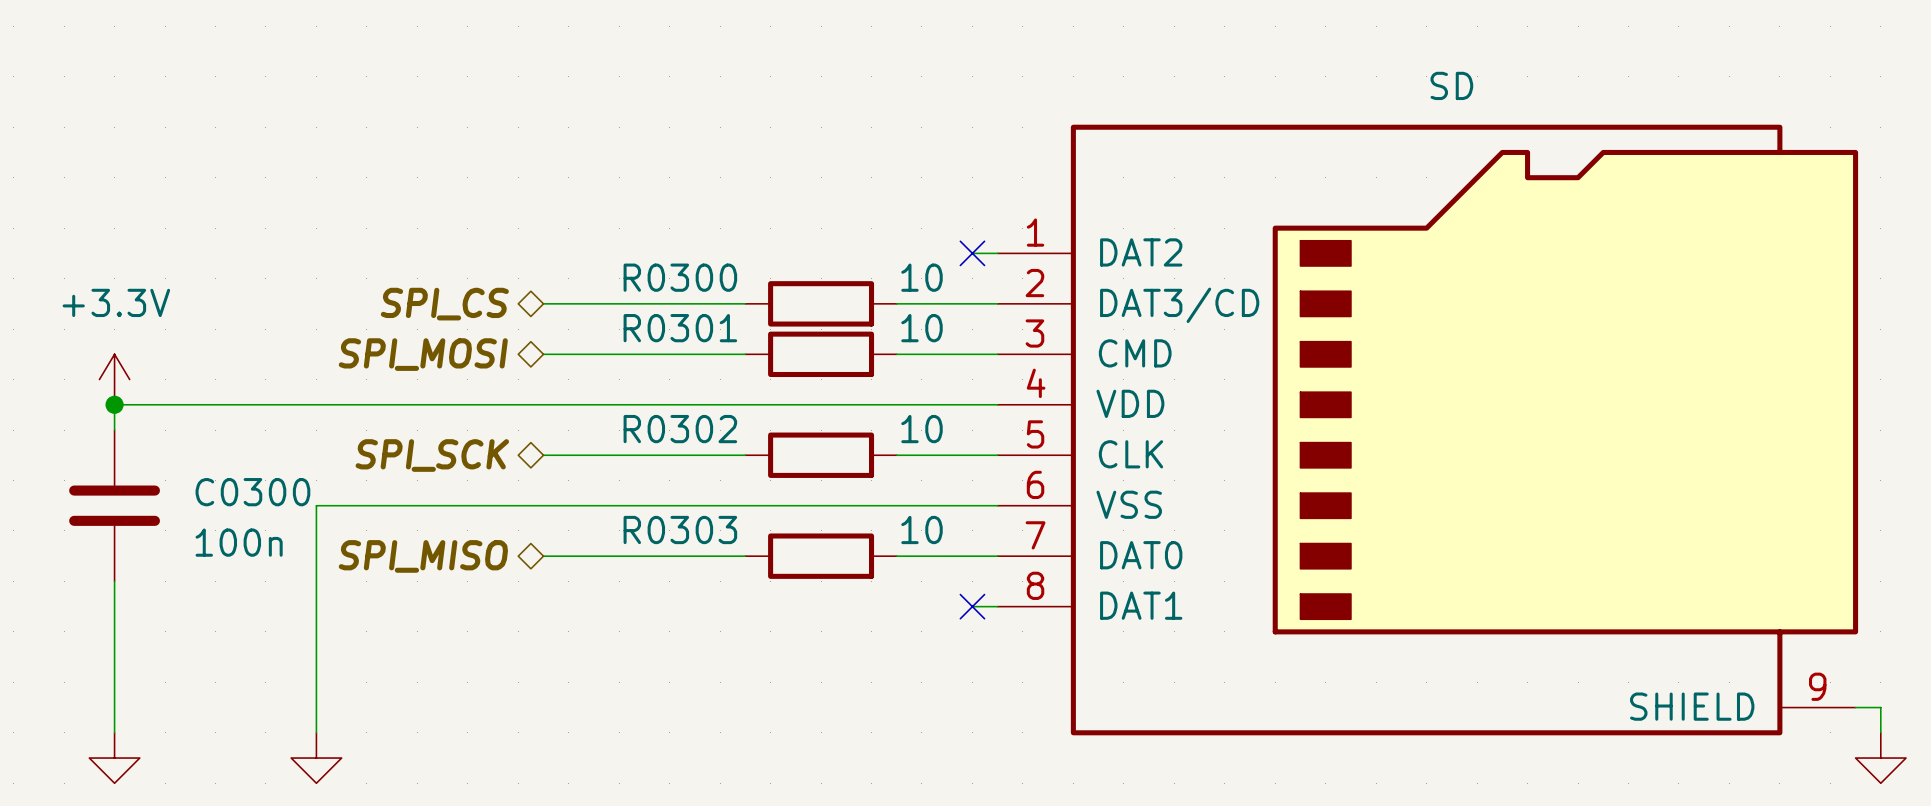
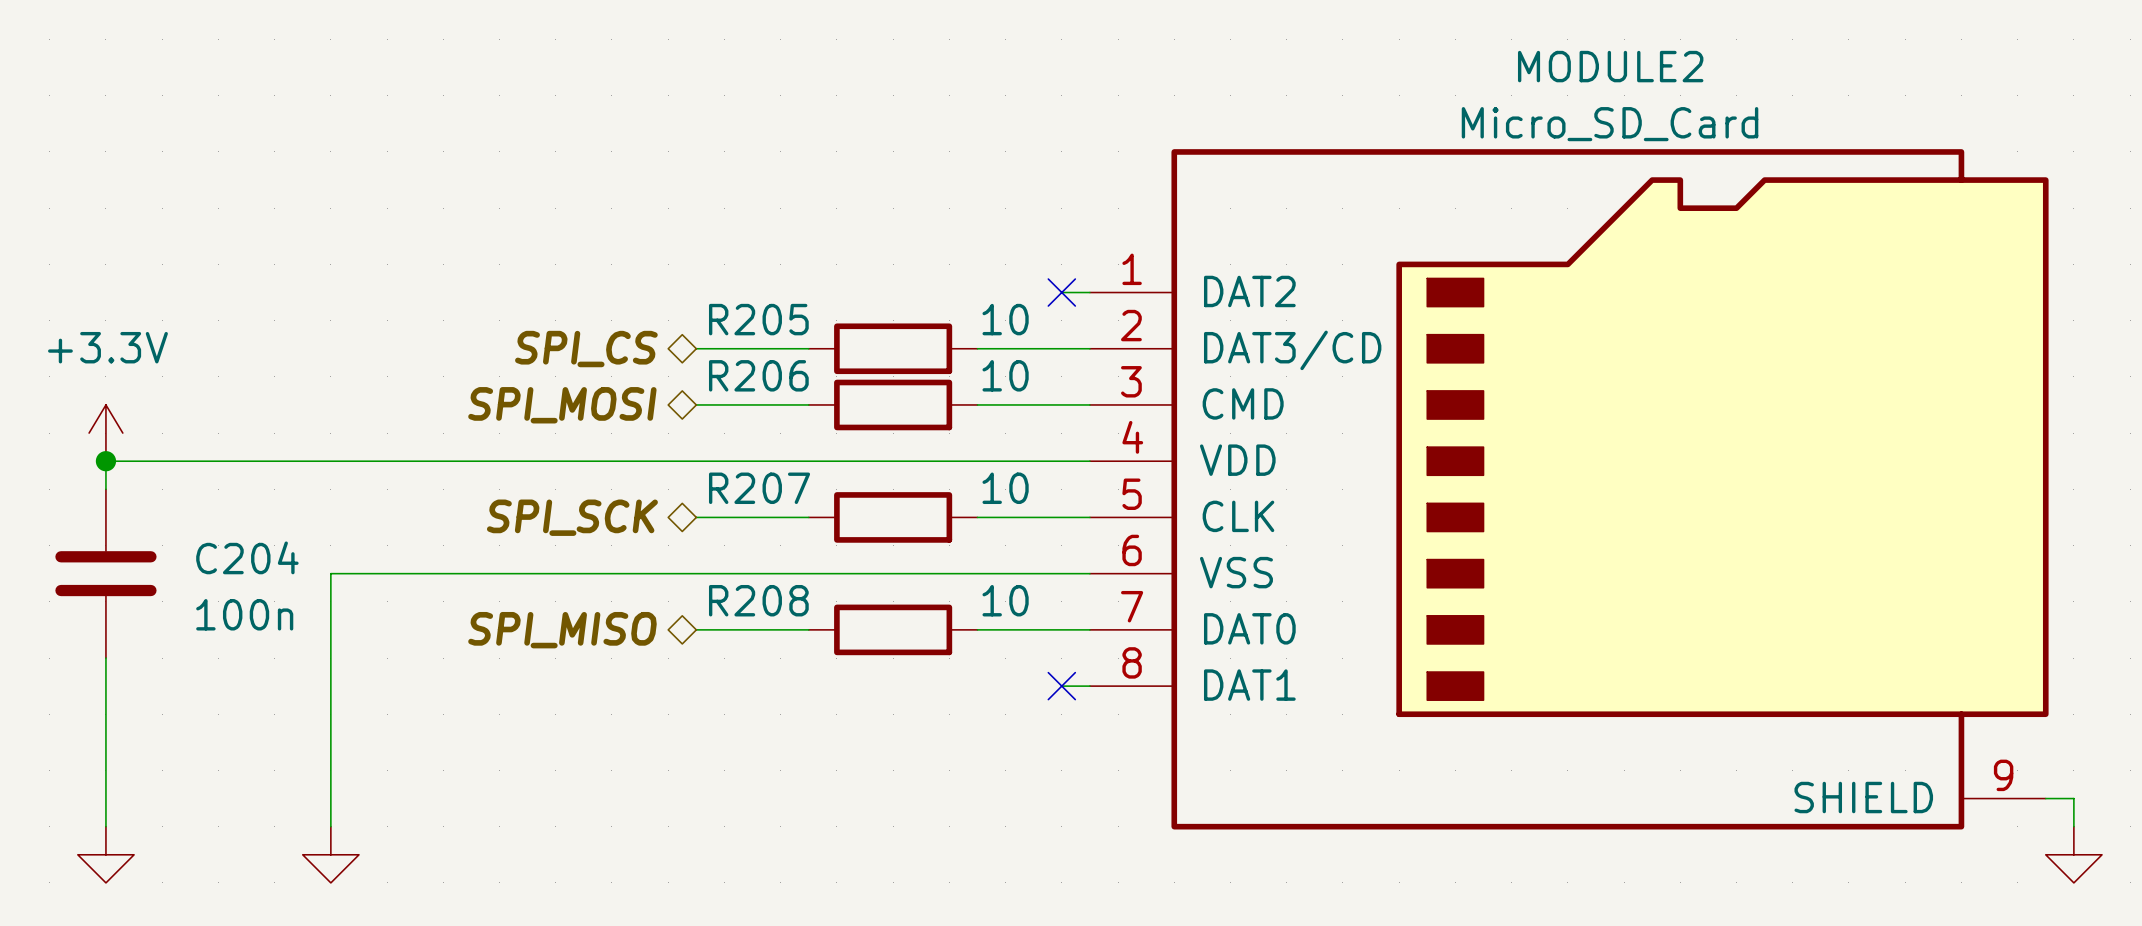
SD name: SD (1451, 85) -> MODULE2 (1610, 66)
SD value: none -> Micro_SD_Card (1610, 124)
R0300 name: R0300 (680, 277) -> R205 (758, 319)
wire: (543, 303) (644, 303) -> none
hierarchical label position: SPI_CS (444, 304) -> SPI_CS (586, 349)
R0301 name: R0301 (680, 328) -> R206 (758, 375)
hierarchical label position: SPI_MOSI (423, 354) -> SPI_MOSI (562, 405)
wire: (543, 354) (644, 354) -> none
R0302 name: R0302 (680, 429) -> R207 (759, 488)
hierarchical label position: SPI_SCK (432, 455) -> SPI_SCK (572, 517)
wire: (543, 455) (644, 455) -> none
C0300 name: C0300 (252, 492) -> C204 (247, 557)
R0303 name: R0303 (680, 530) -> R208 (758, 600)
hierarchical label position: SPI_MISO (423, 556) -> SPI_MISO (562, 630)
wire: (543, 556) (644, 556) -> none

